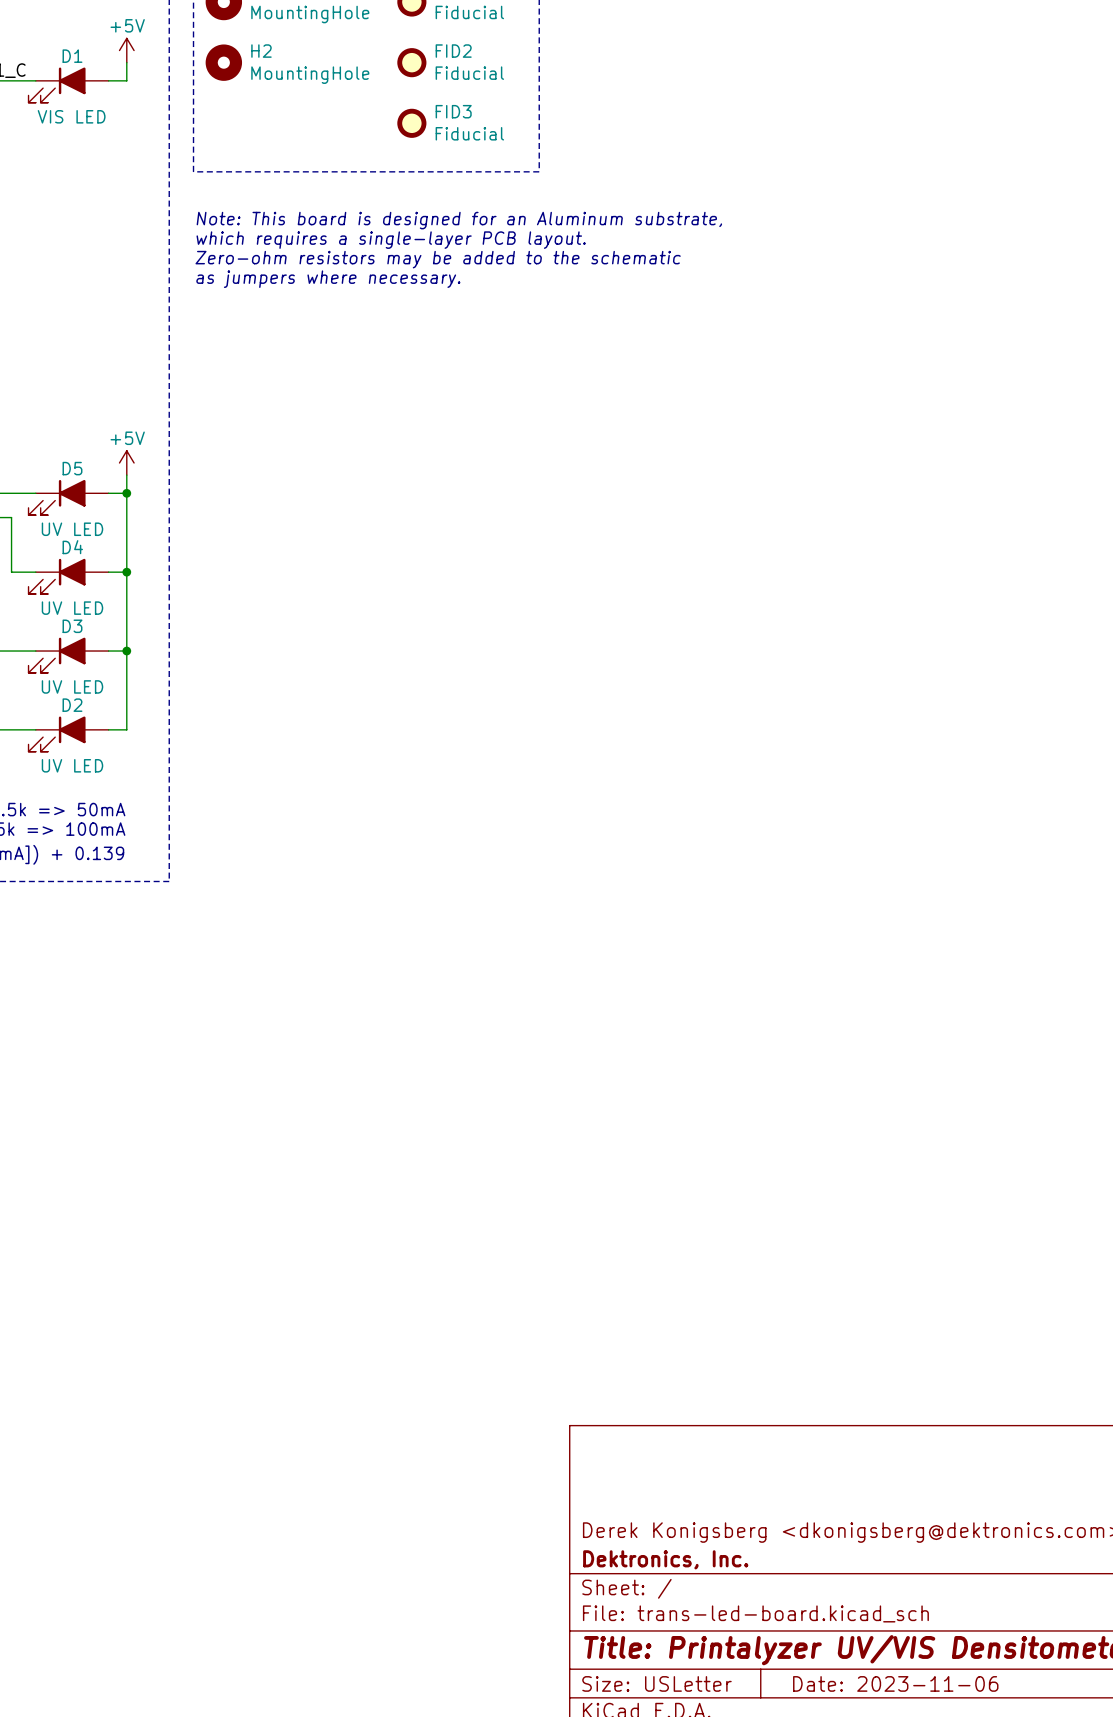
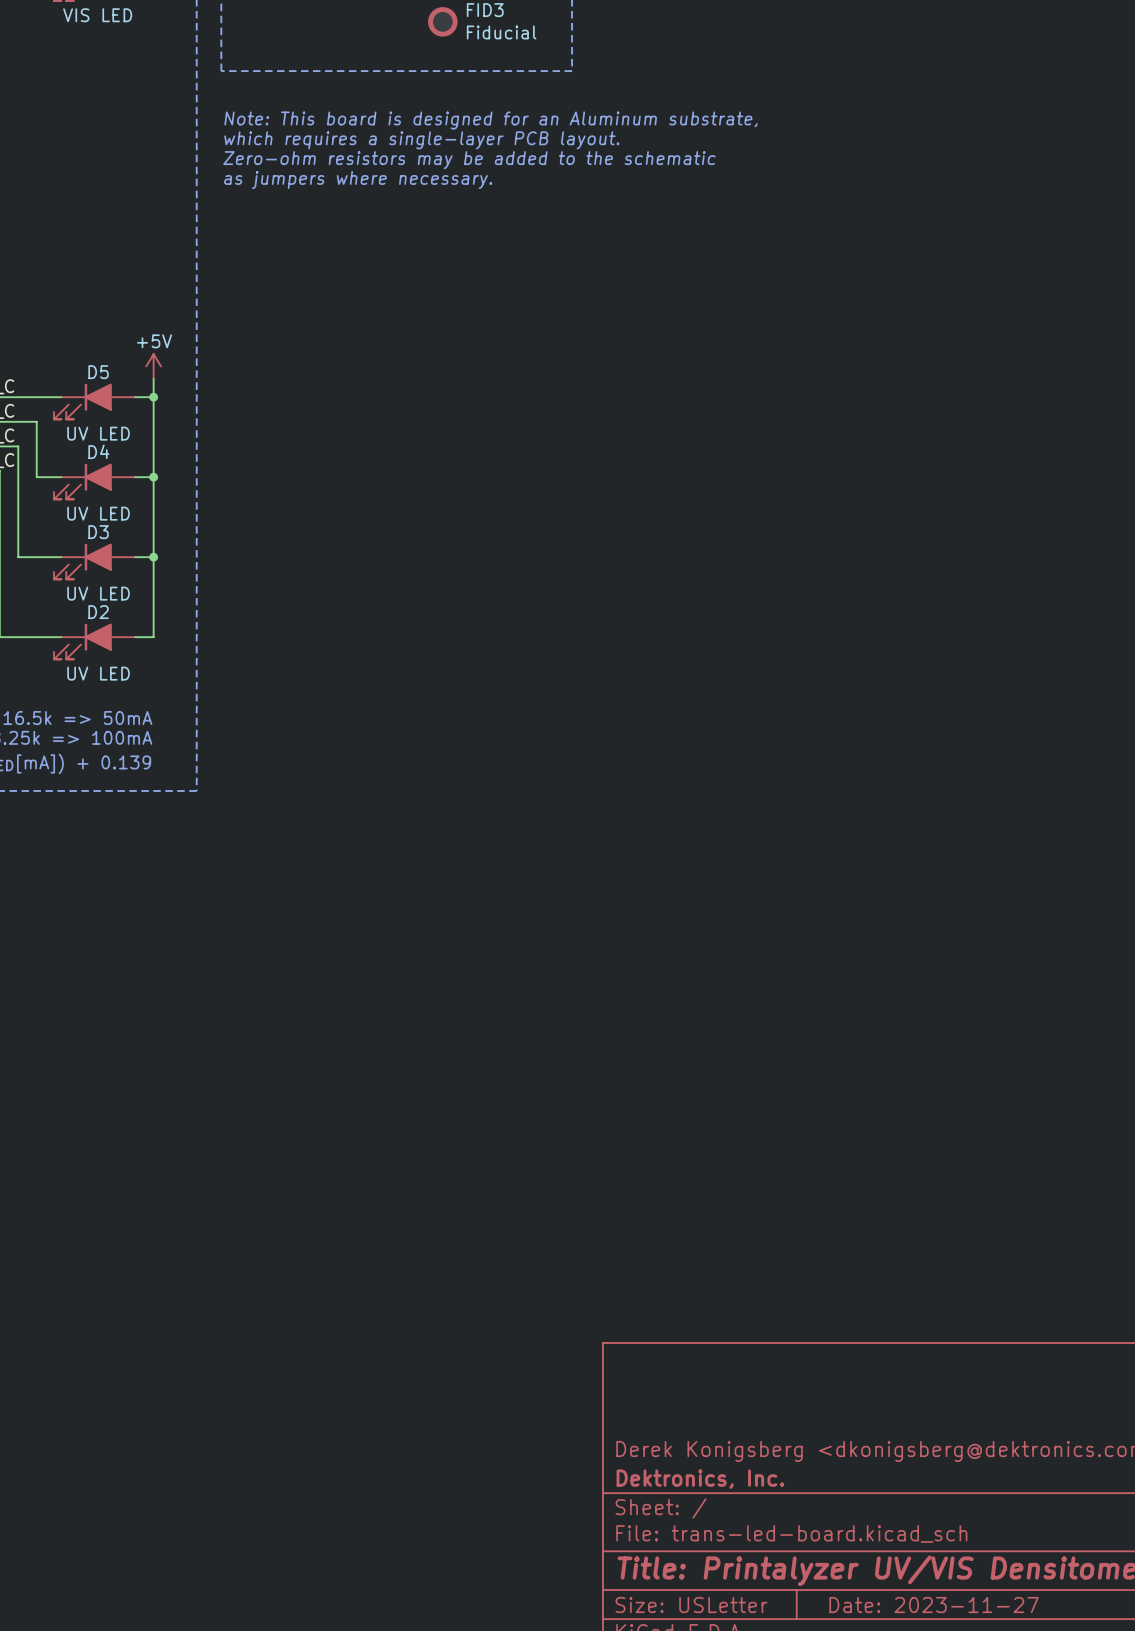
title block: Date: 2023-11-06 (895, 1683) -> Date: 2023-11-27 (934, 1605)

